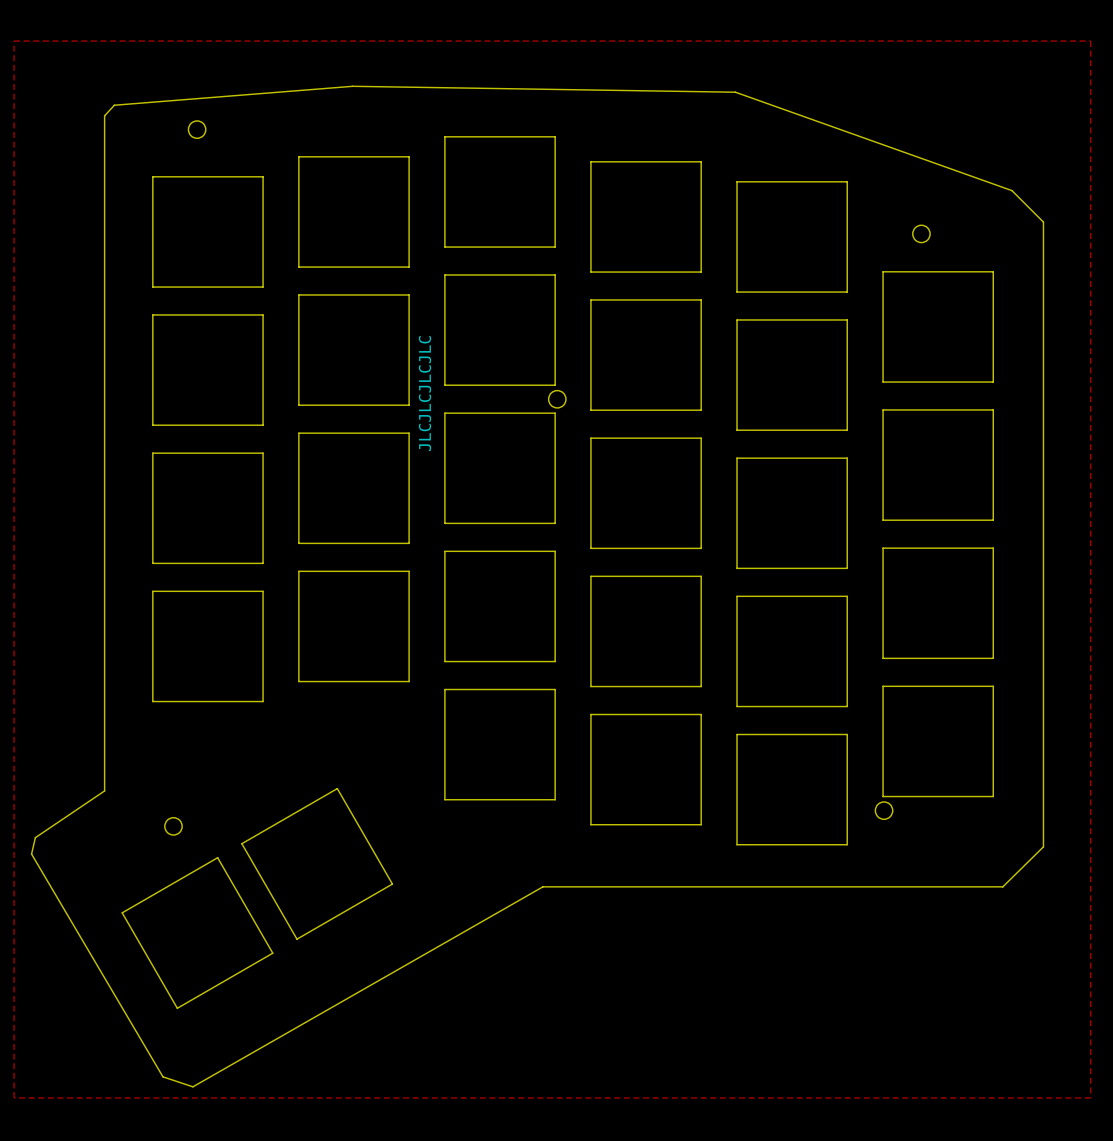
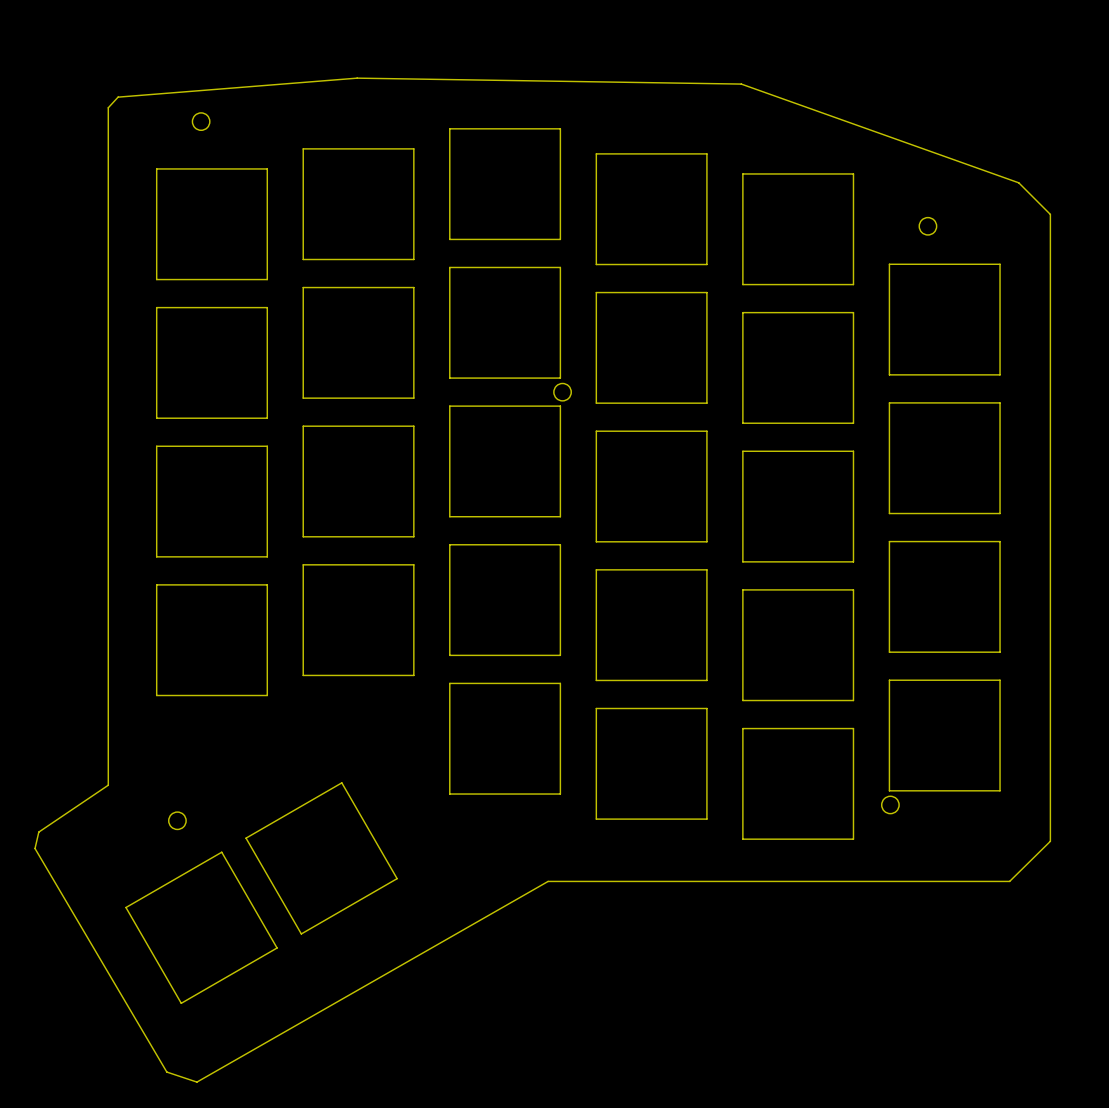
zone outline: (14, 41) (14, 1098) (1090, 1098) (1090, 41) (14, 41) -> none
text: JLCJLCJLCJLC (425, 393) -> none

